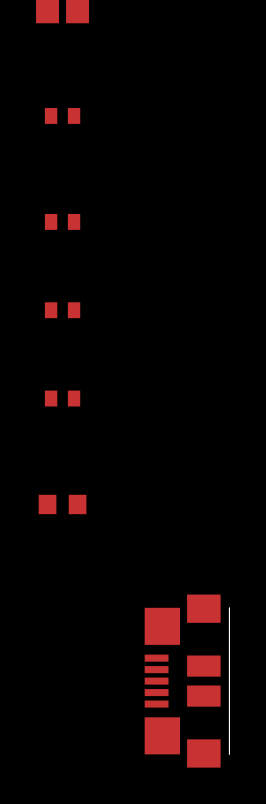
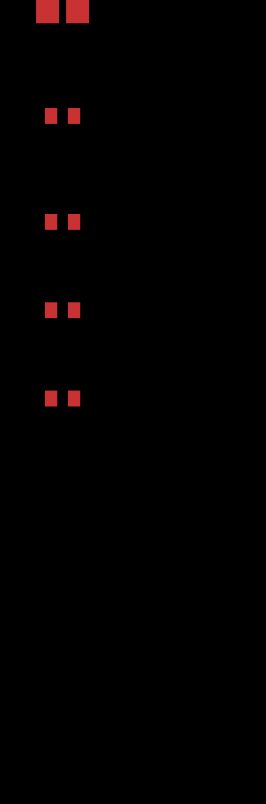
part: (62, 504) -> none
part: (187, 681) -> none

